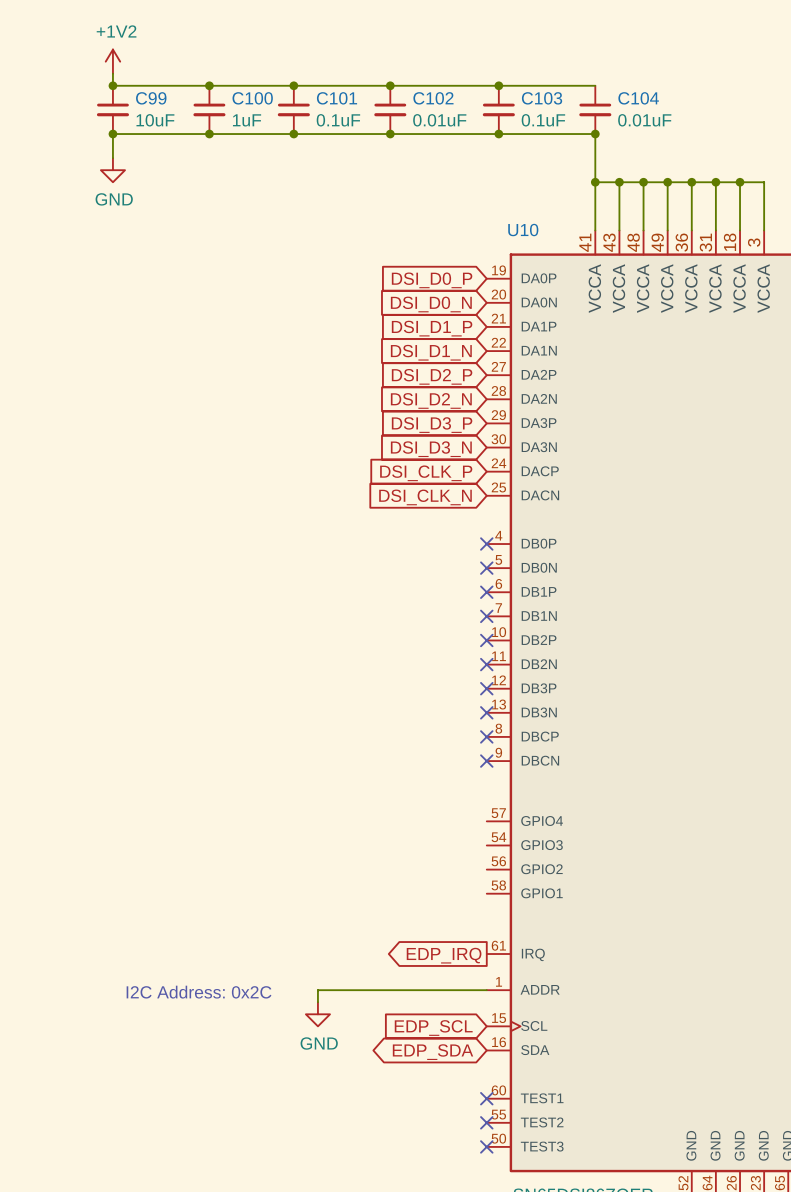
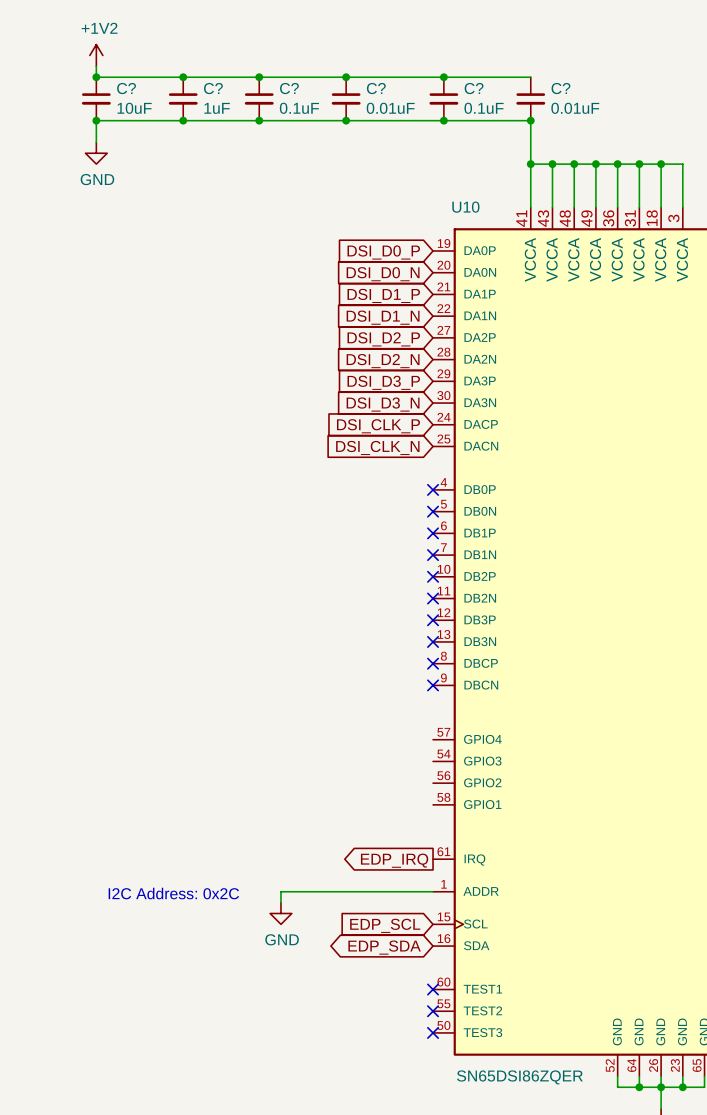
C99 name: C99 (151, 98) -> C? (126, 88)
C100 name: C100 (252, 98) -> C? (213, 88)
C101 name: C101 (337, 98) -> C? (289, 88)
C102 name: C102 (433, 98) -> C? (376, 88)
C103 name: C103 (542, 98) -> C? (474, 88)
C104 name: C104 (638, 98) -> C? (560, 88)

